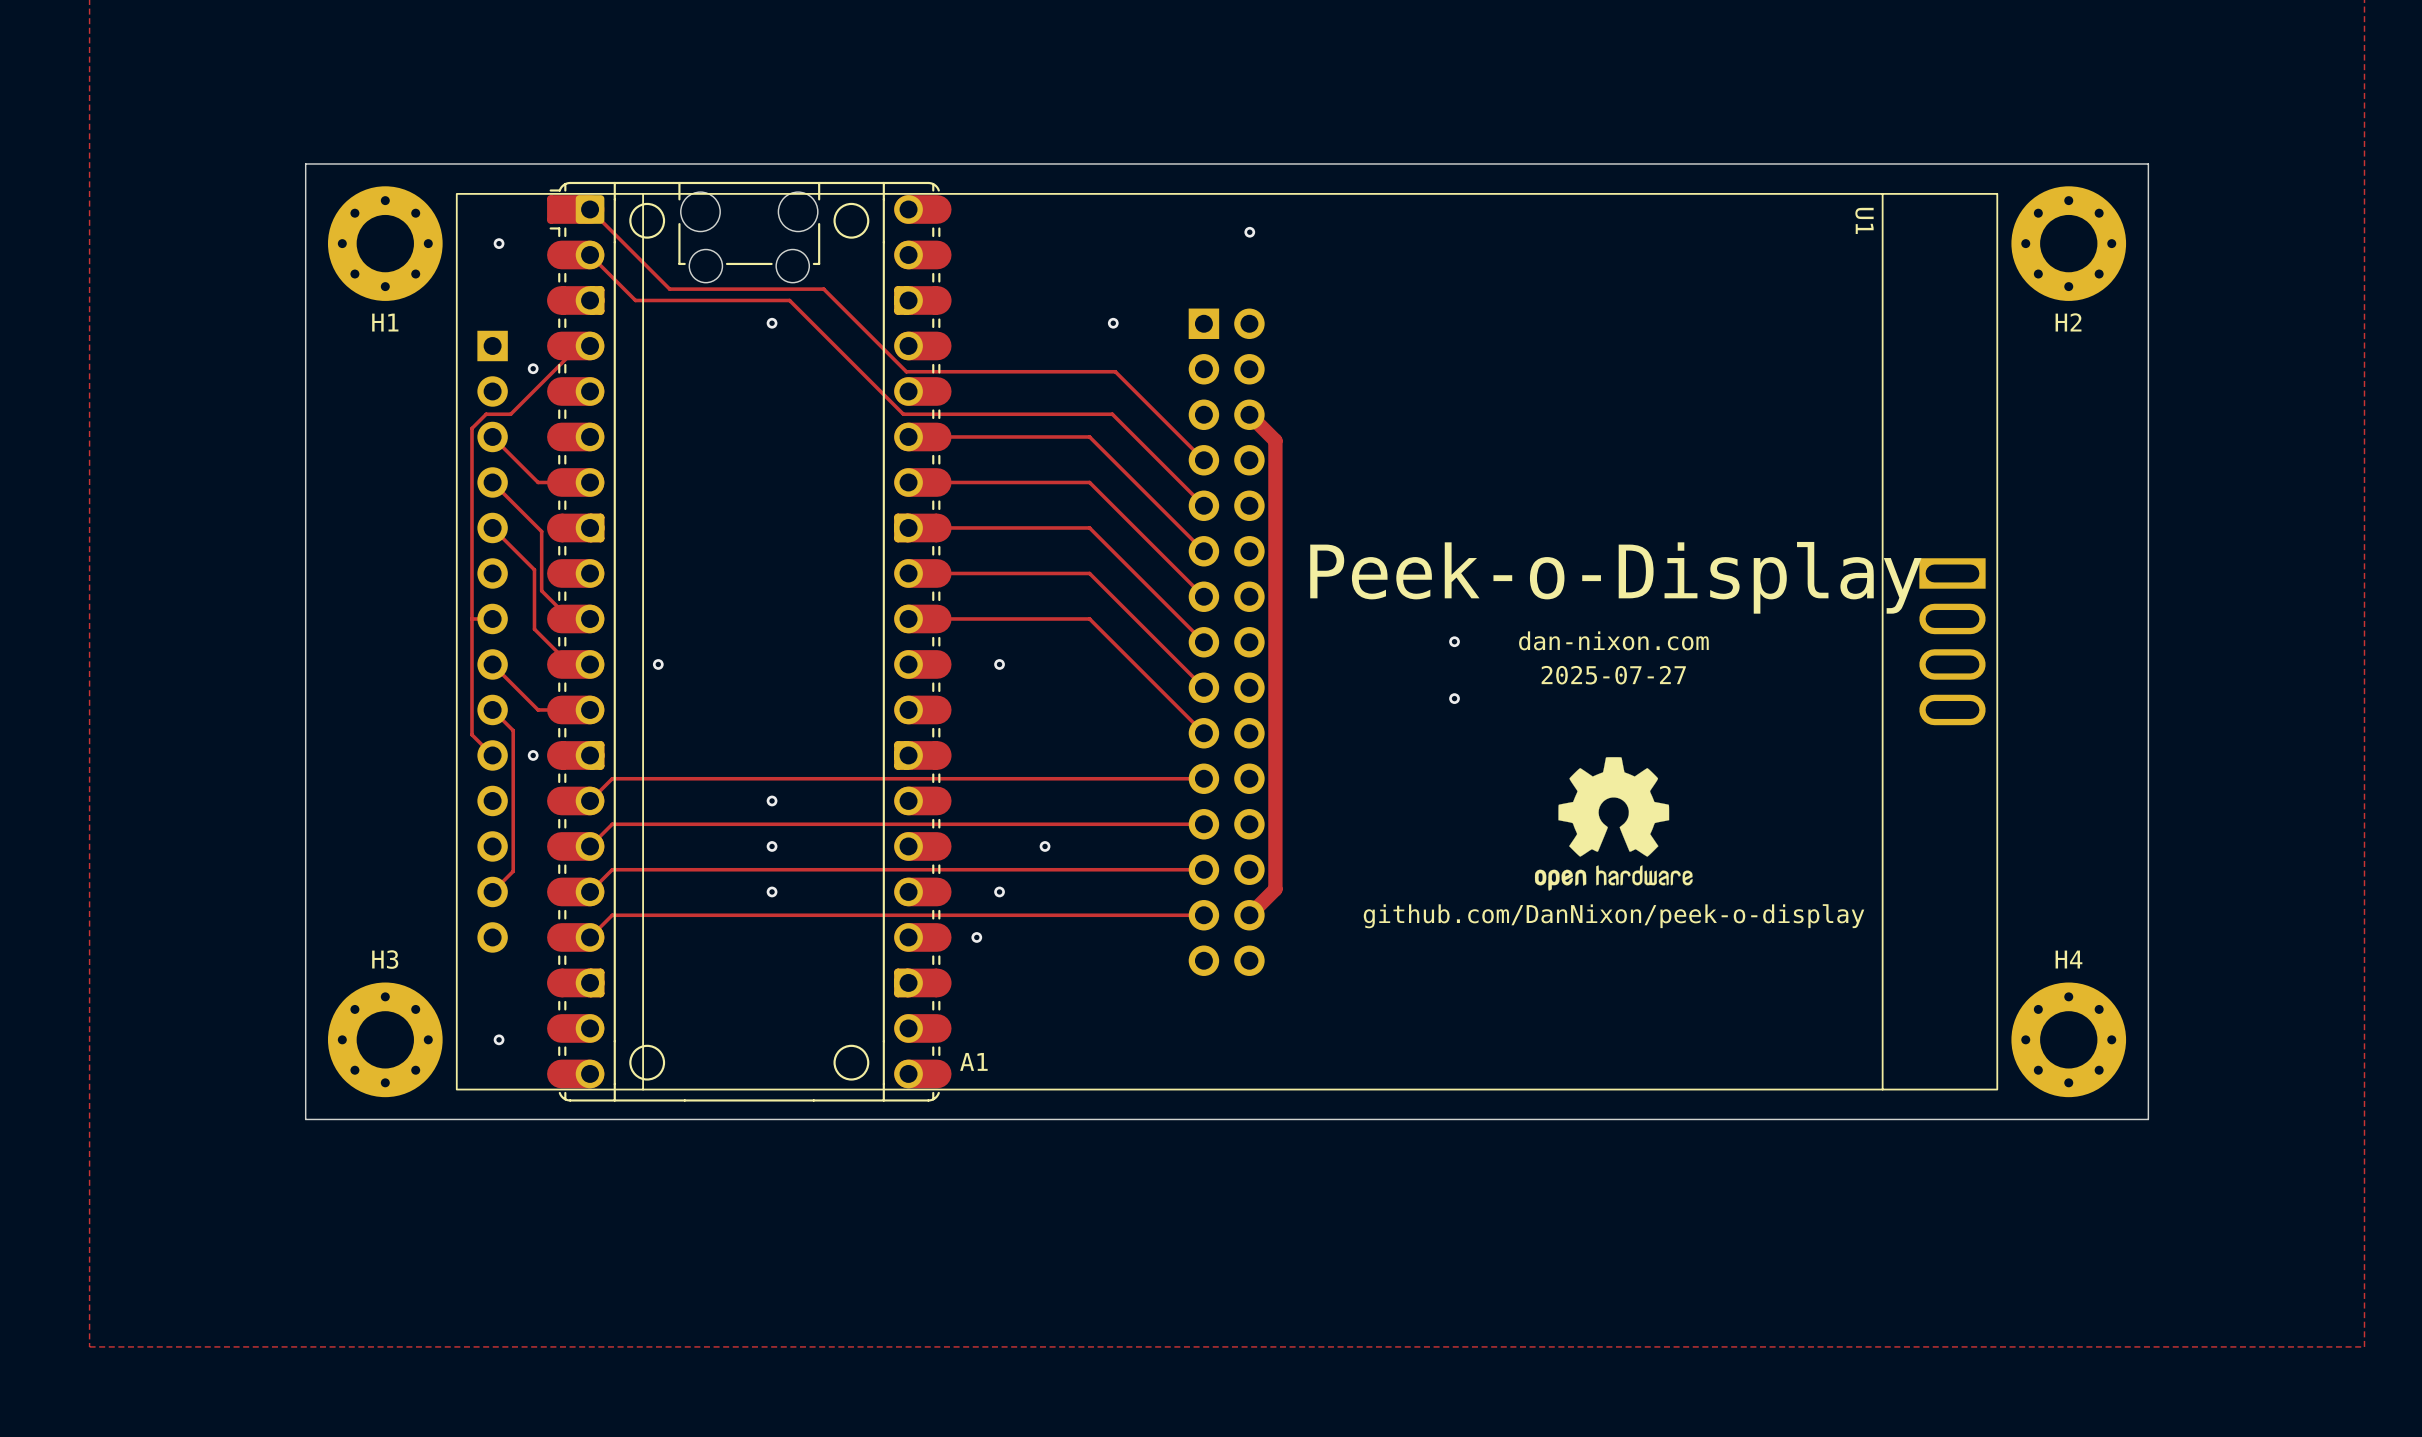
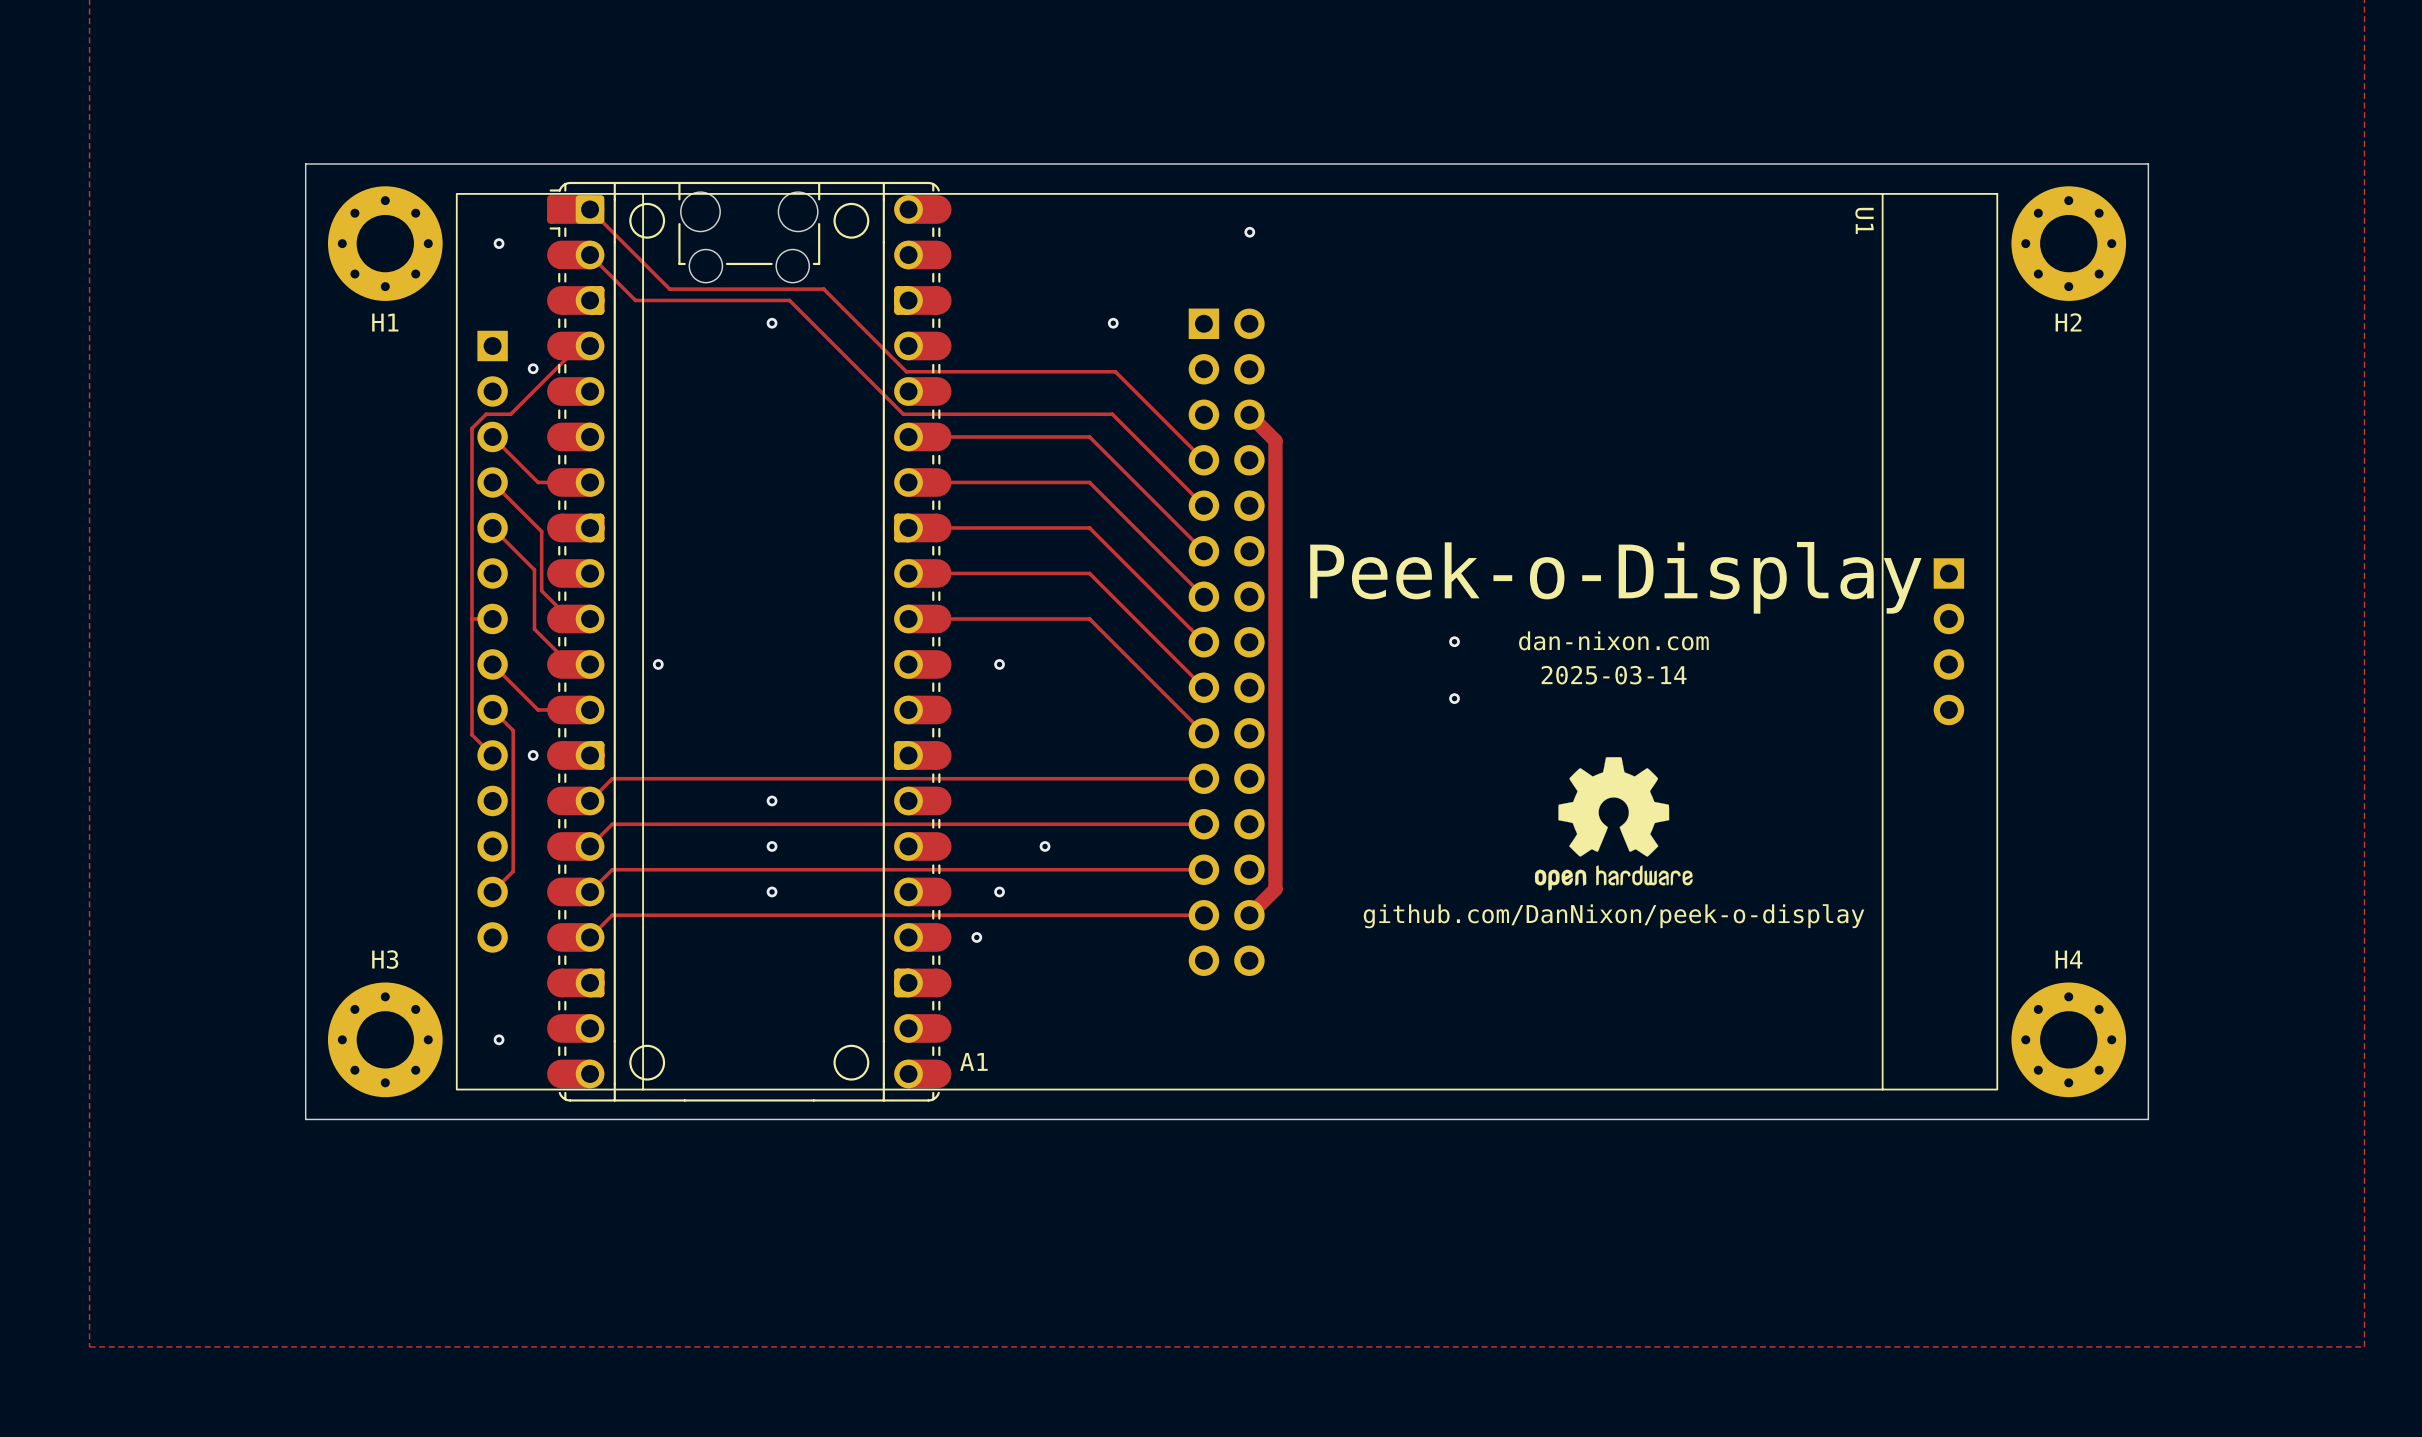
U1 footprint: [455, 193, 1999, 1091] -> [455, 193, 1999, 1091]
text: 2025-07-27 (1613, 675) -> 2025-03-14 (1614, 675)

